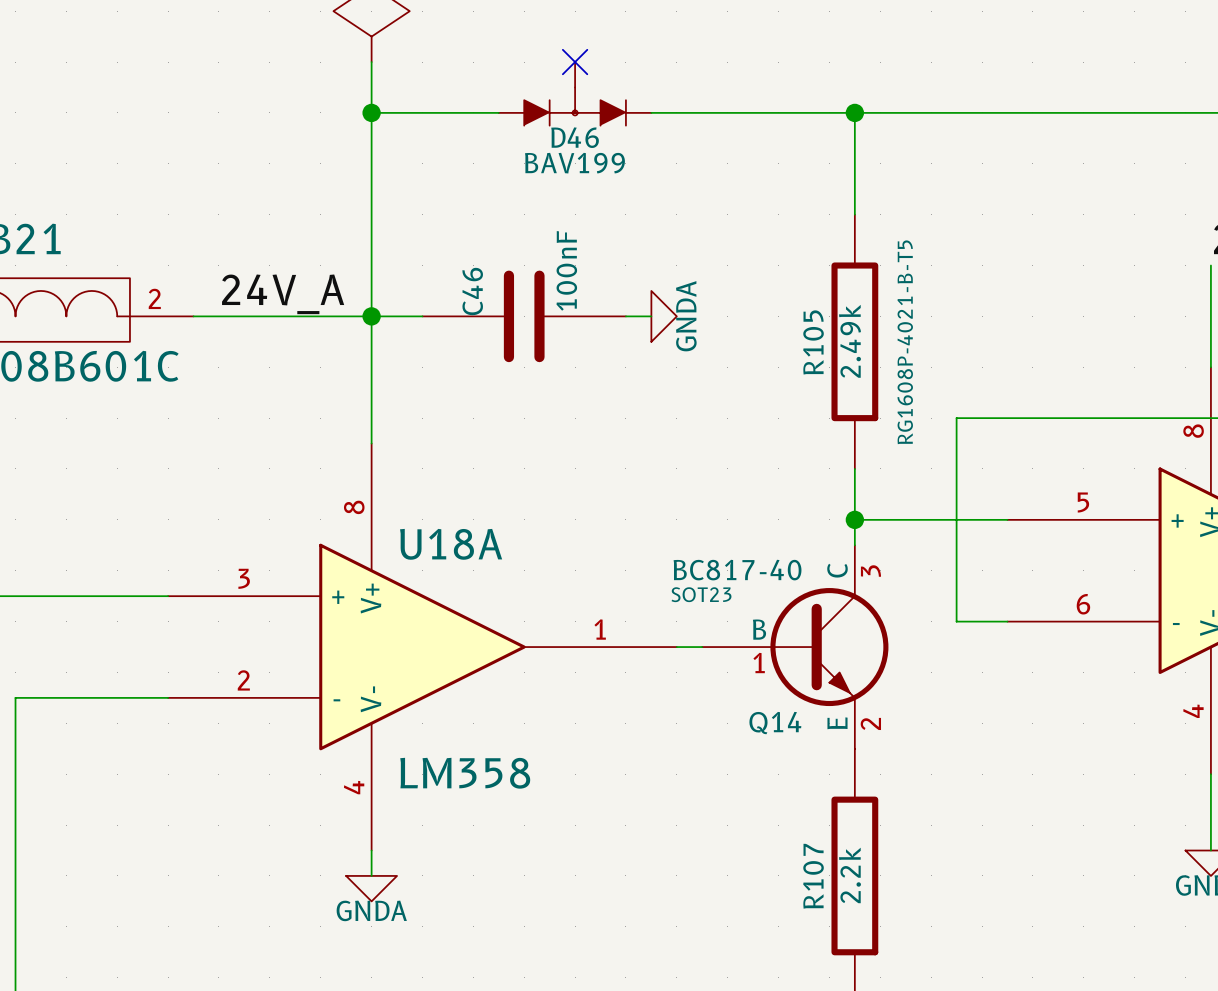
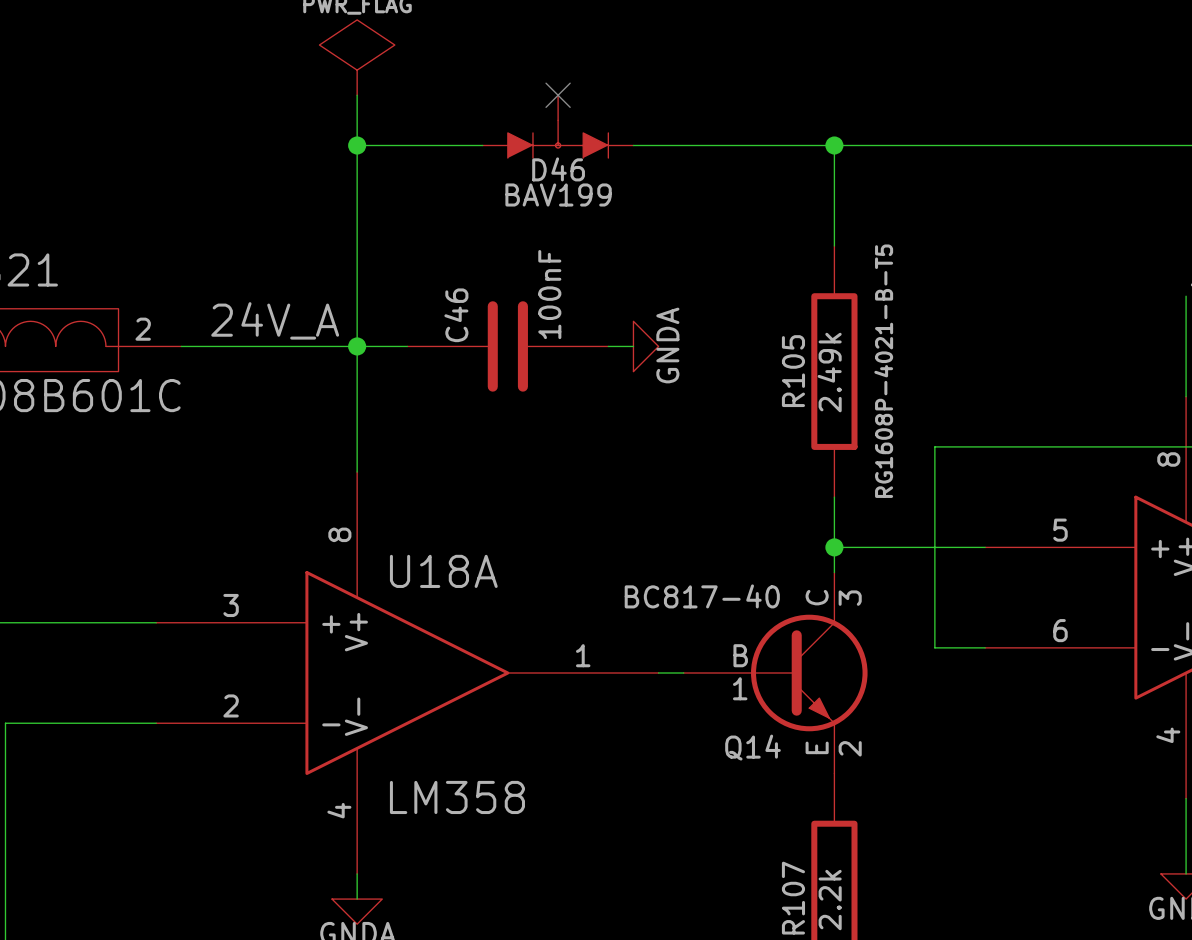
Q14 text: SOT23 (701, 594) -> none

